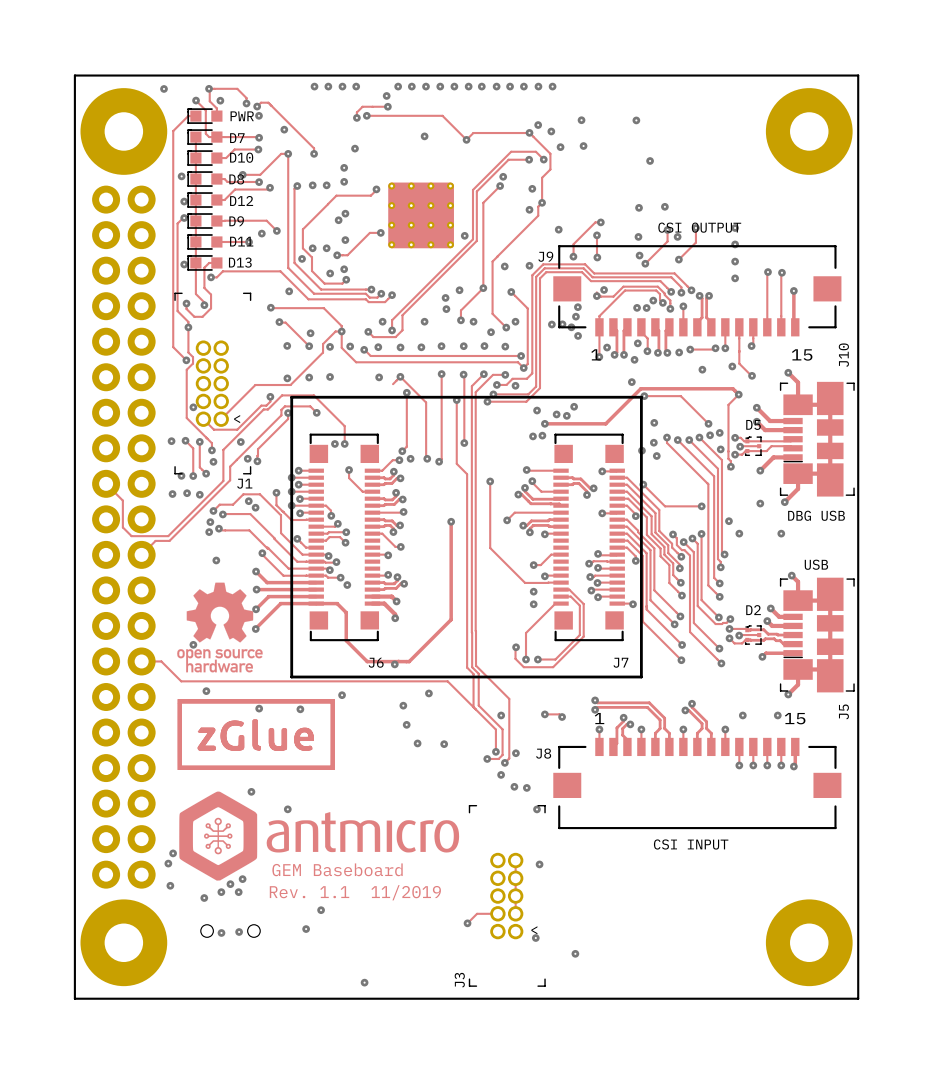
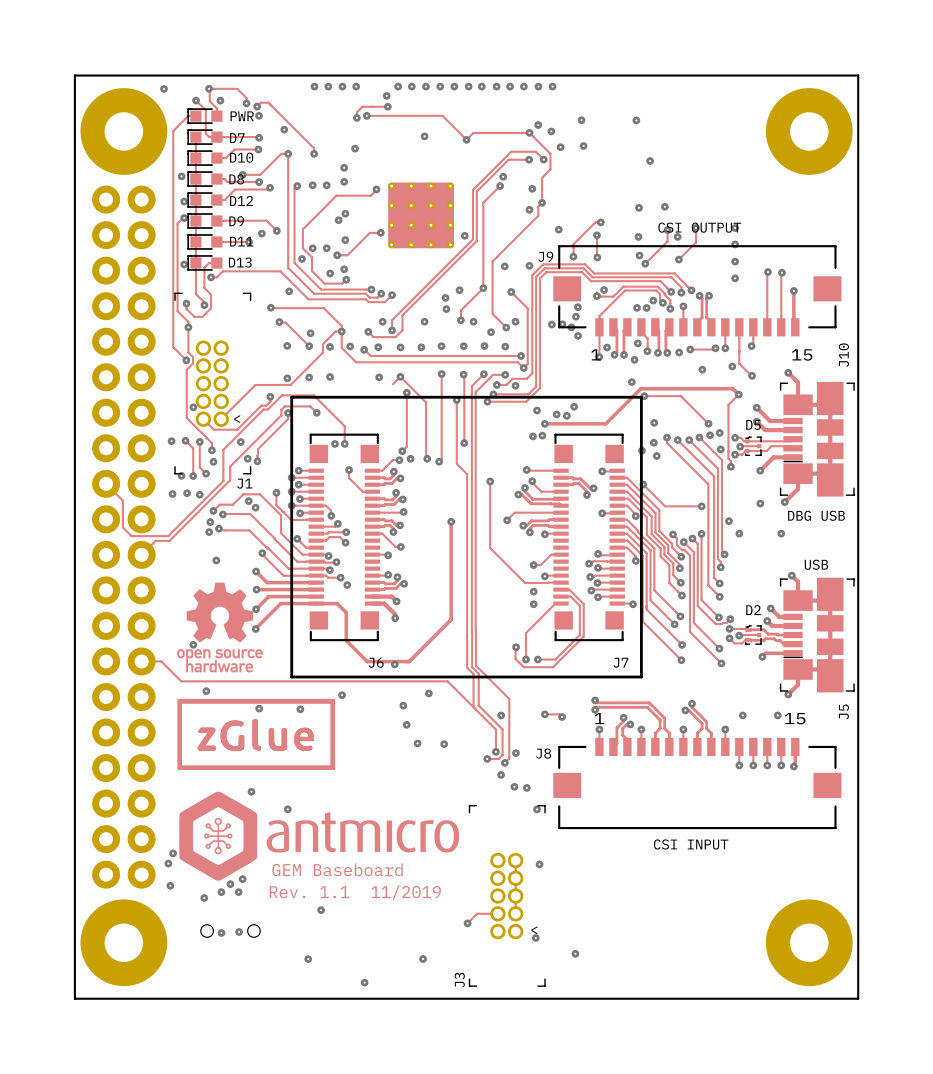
via position: (306, 929) -> (308, 959)
via: none -> (423, 958)

